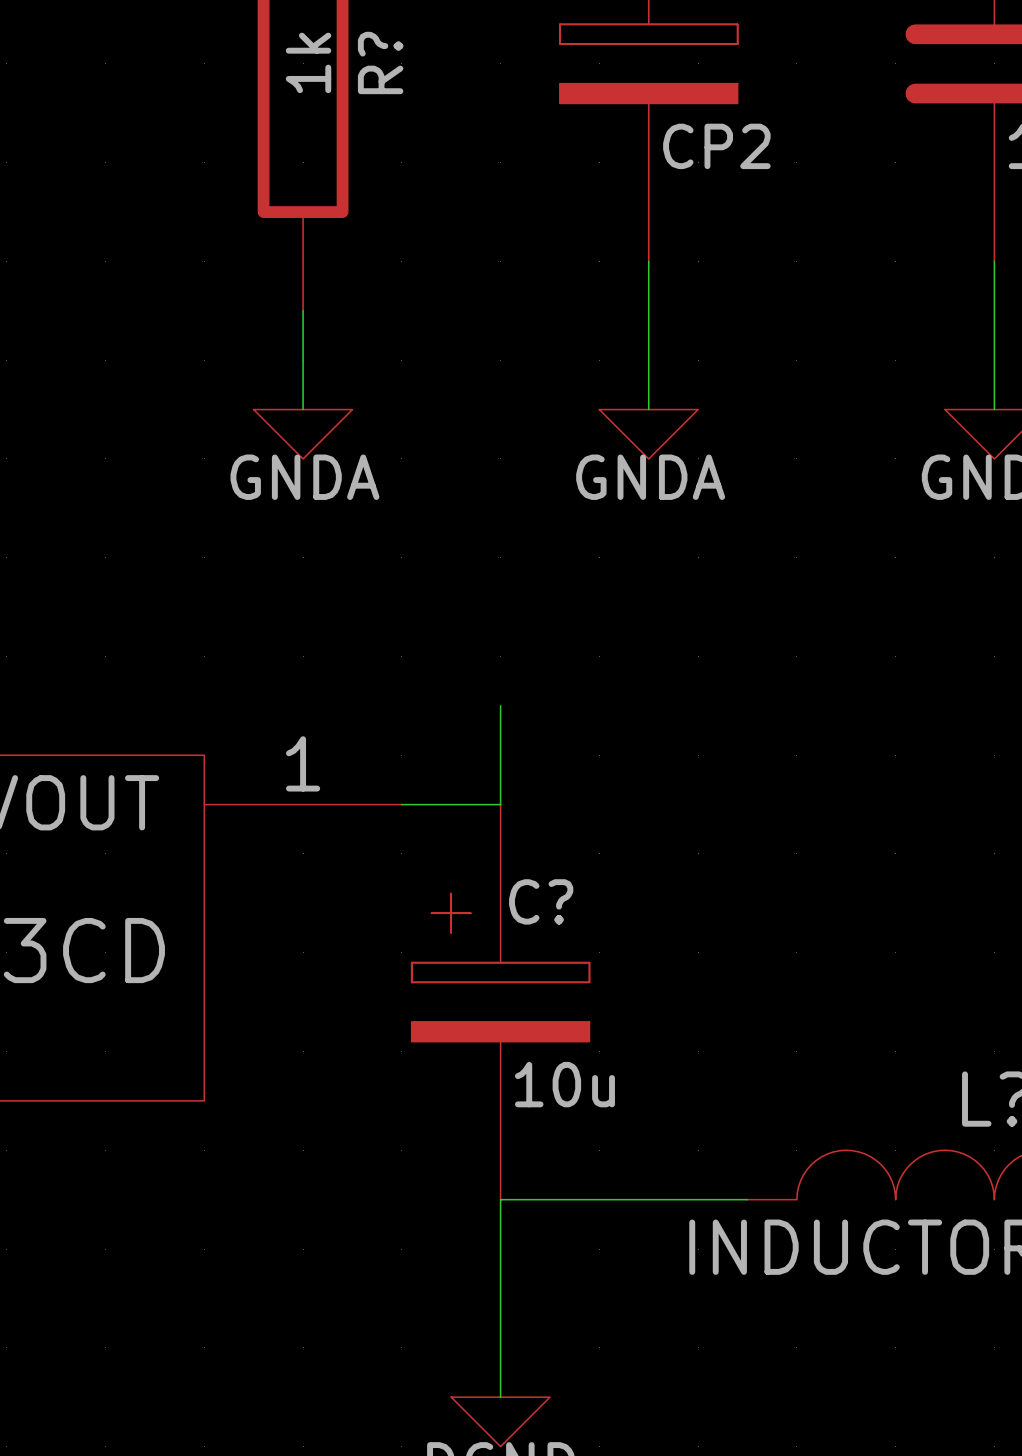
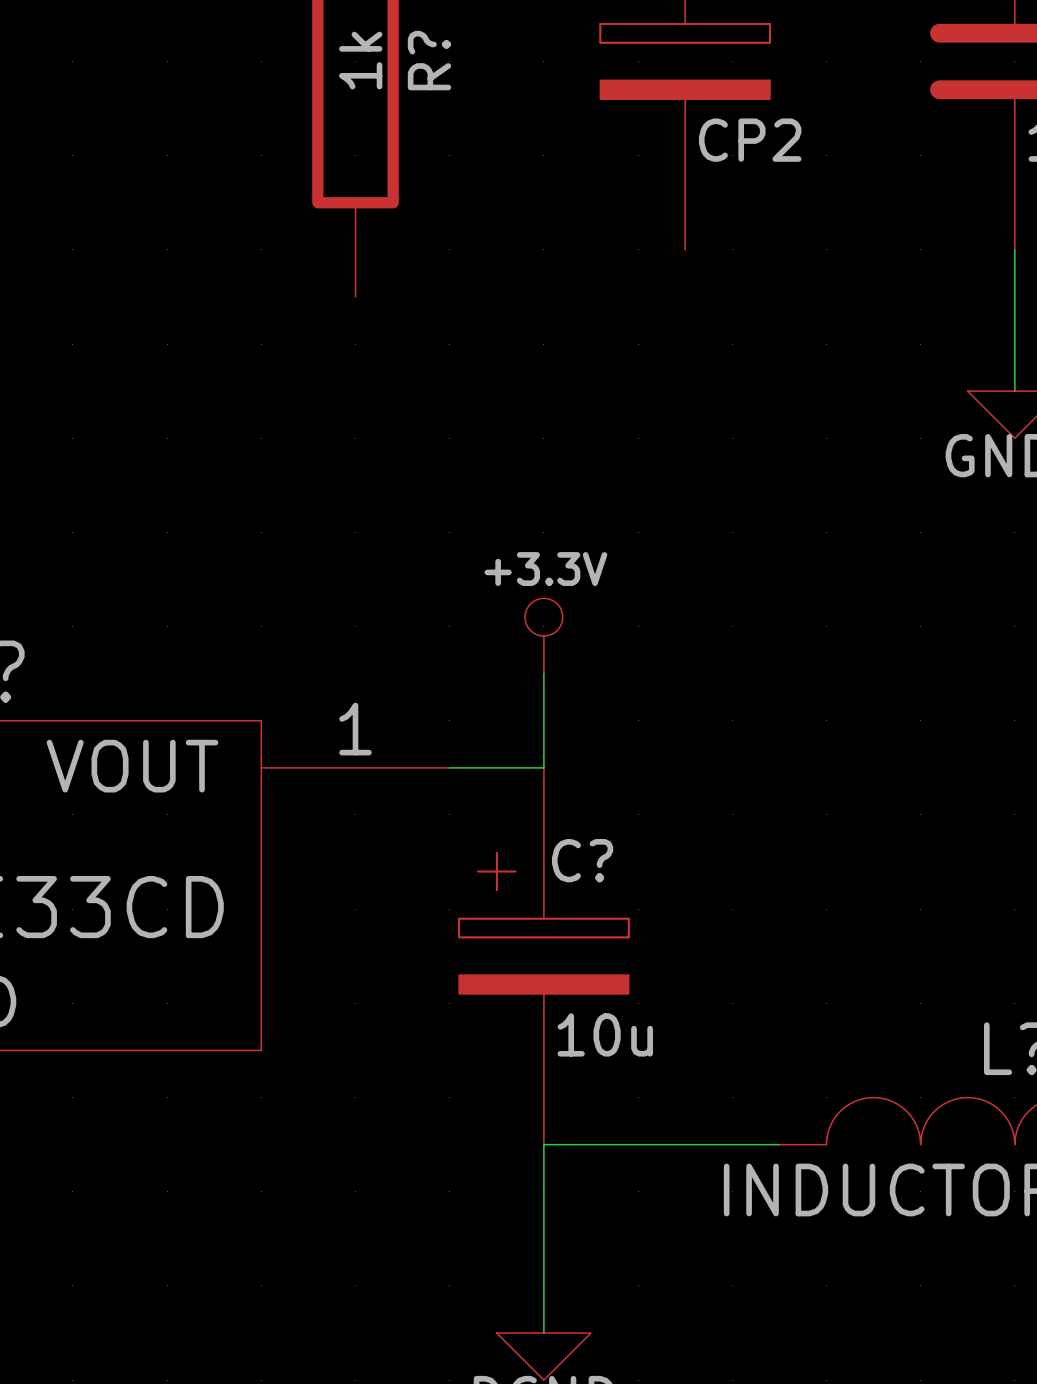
wire: (648, 261) (648, 409) -> none
wire: (303, 310) (303, 409) -> none
power symbol: GNDA (303, 434) -> none
power symbol: GNDA (648, 434) -> none
power symbol: none -> +3.3V (543, 636)

